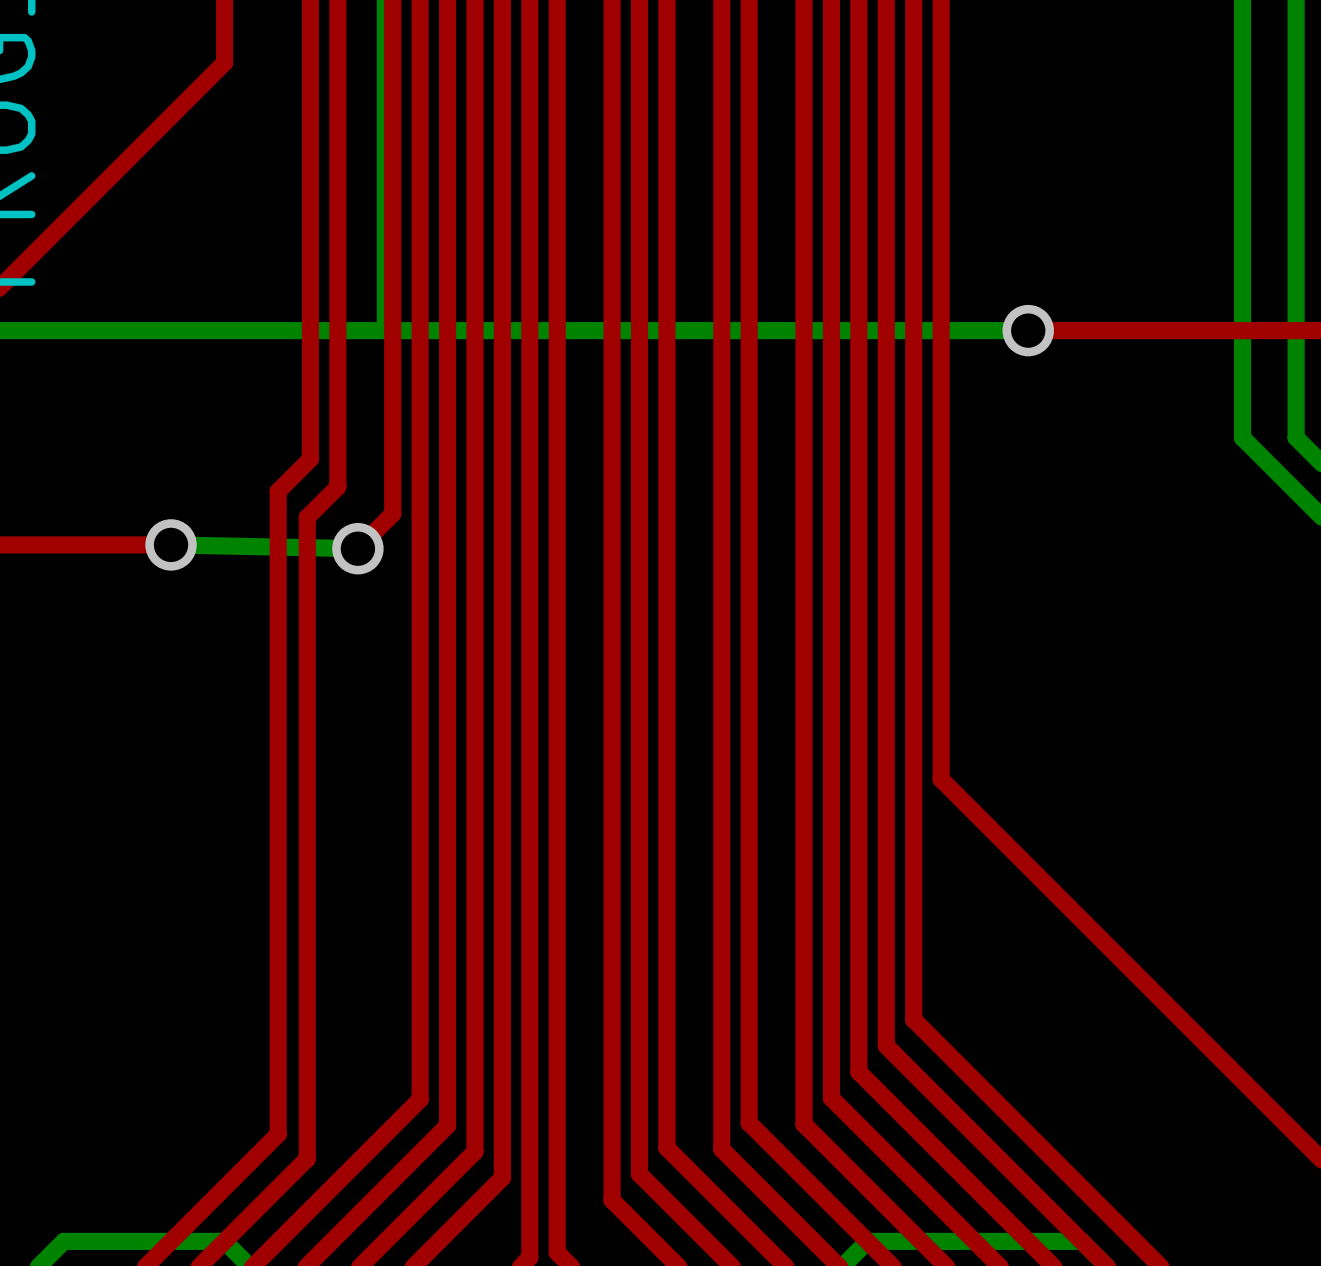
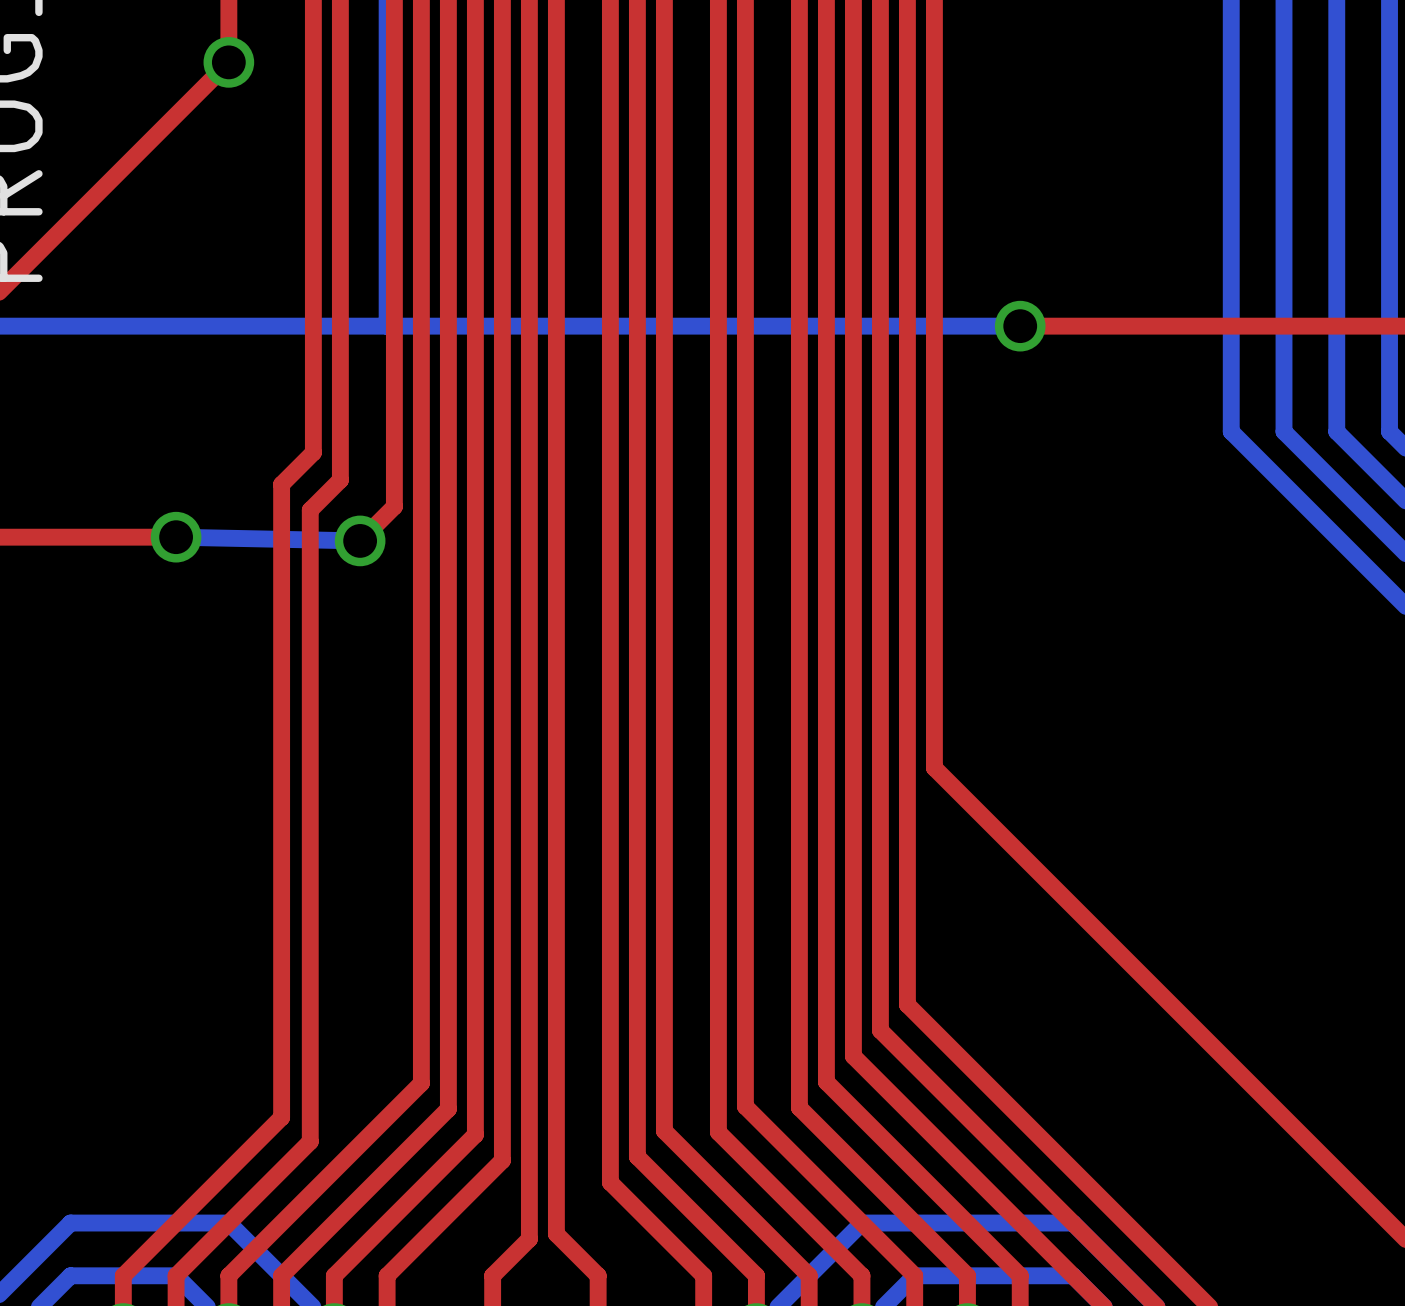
via: none -> (228, 62)

